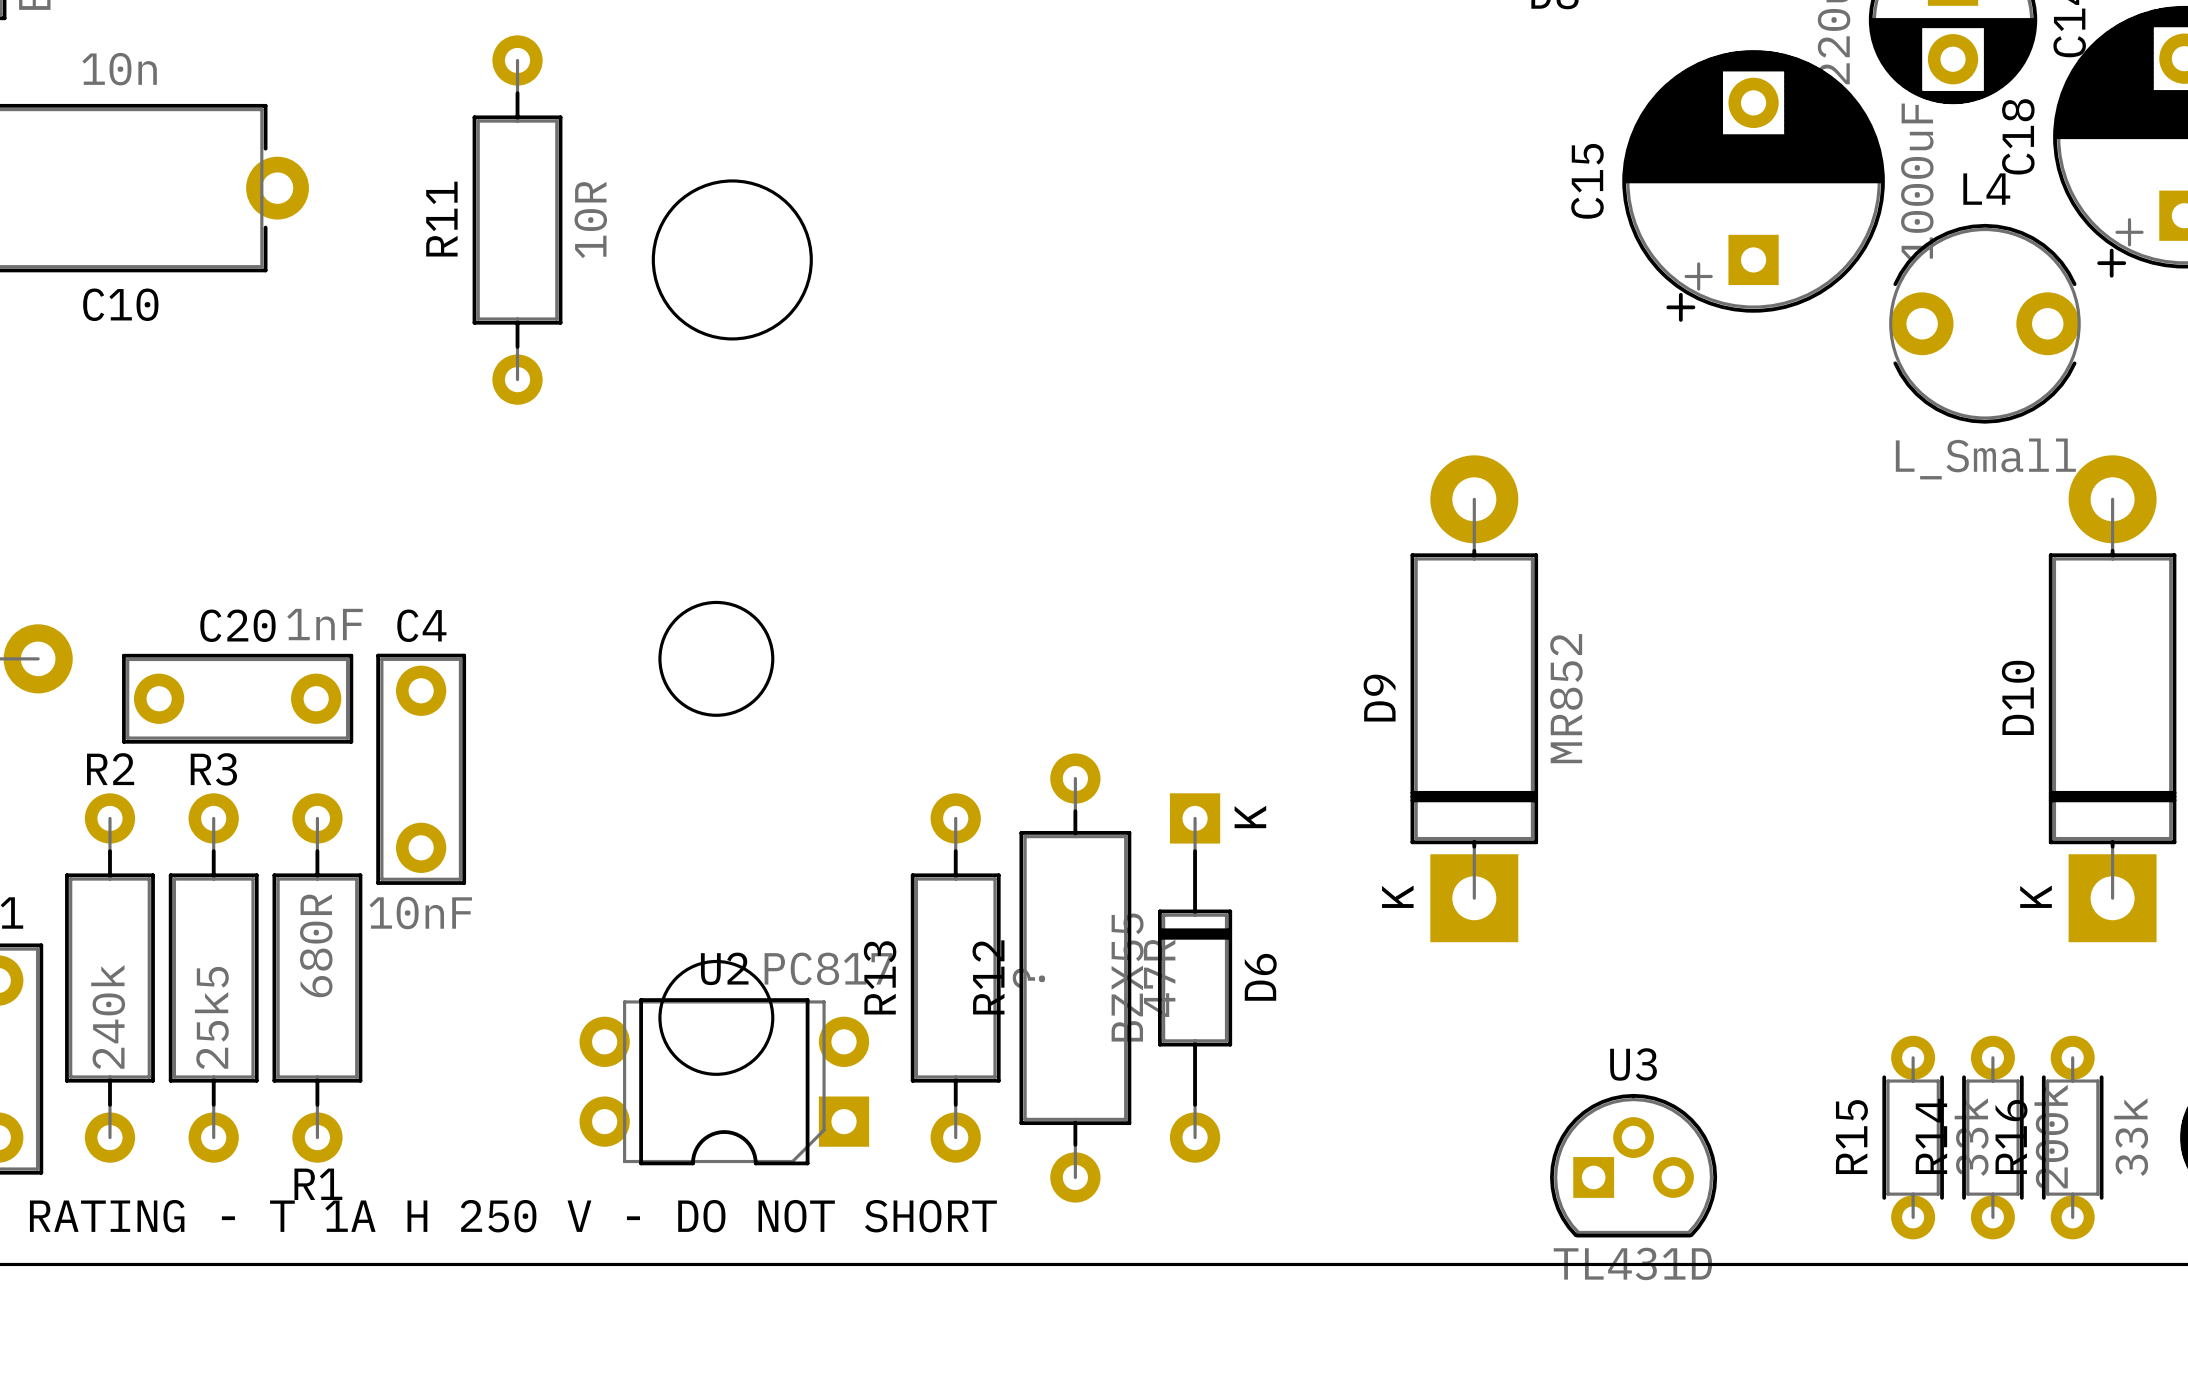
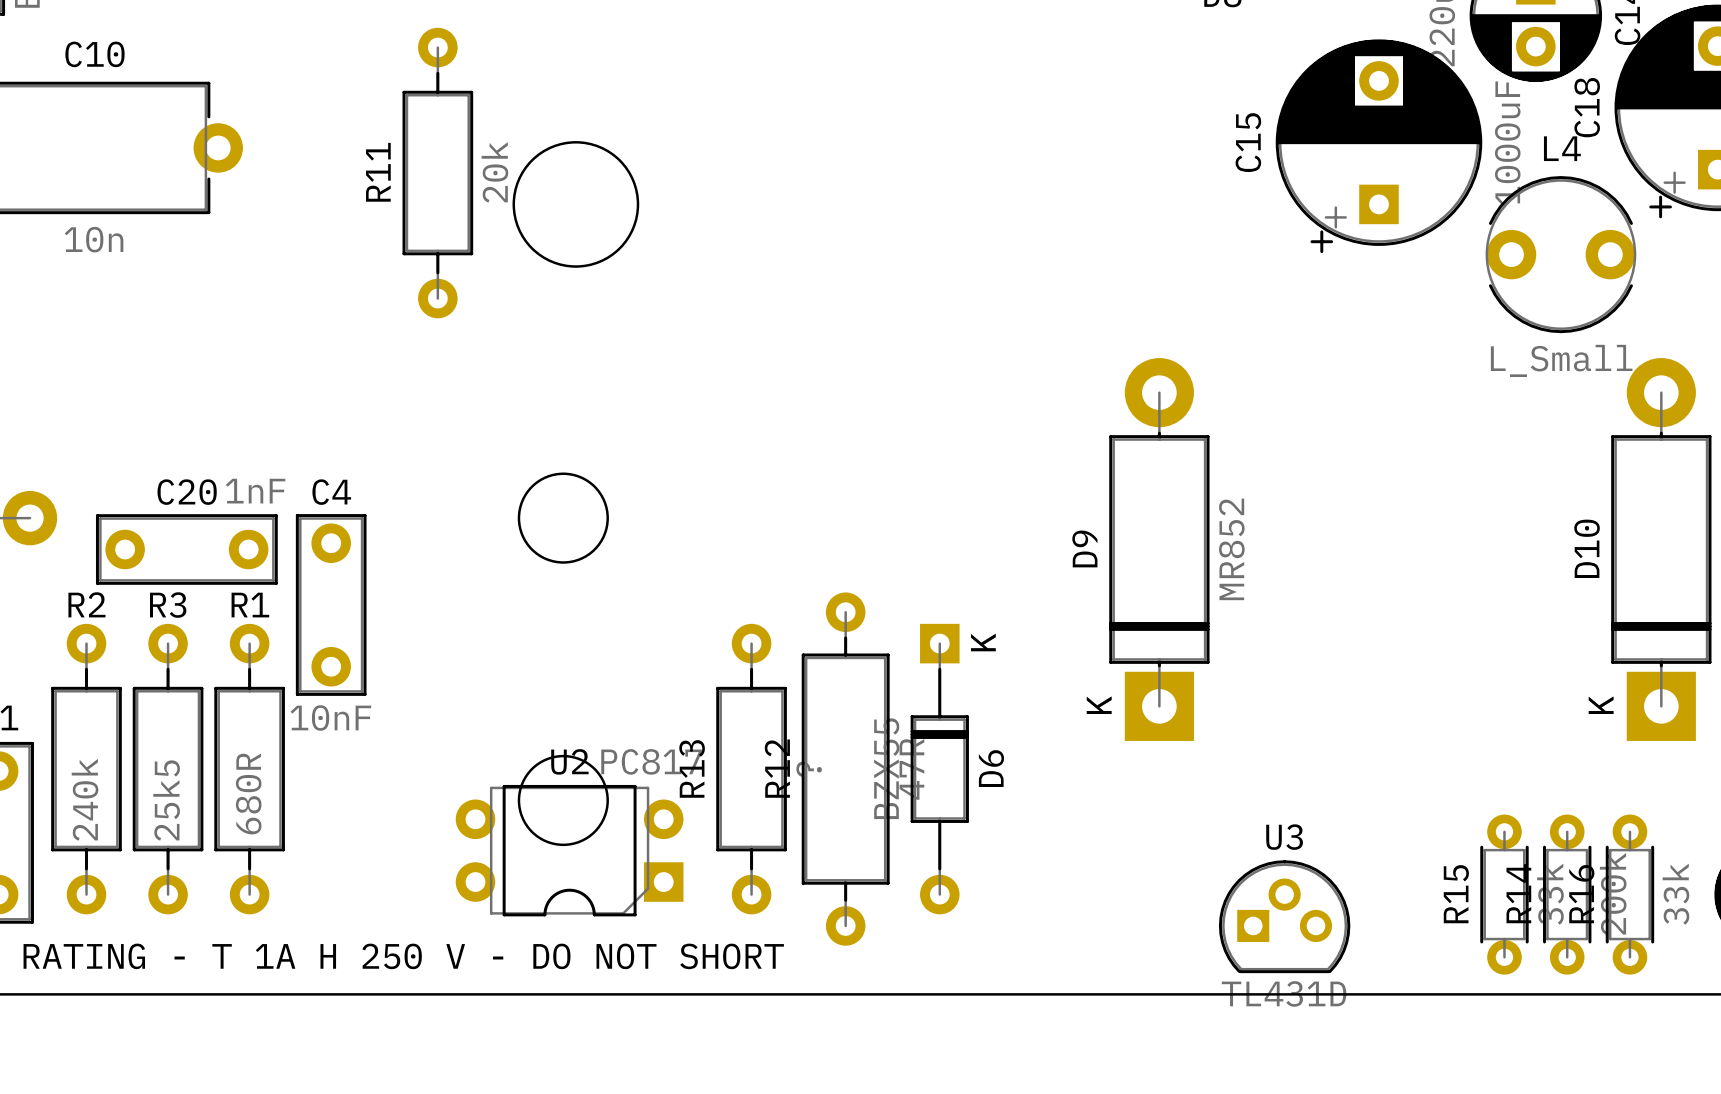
C10 value position: 10n (119, 69) -> 10n (94, 239)
R11 position: (517, 220) -> (437, 173)
R11 value: 10R (590, 220) -> 20k (494, 172)
C10 name position: C10 (120, 304) -> C10 (94, 54)
R1 value position: 680R (316, 945) -> 680R (248, 793)
R1 name position: R1 (318, 1184) -> R1 (250, 605)

